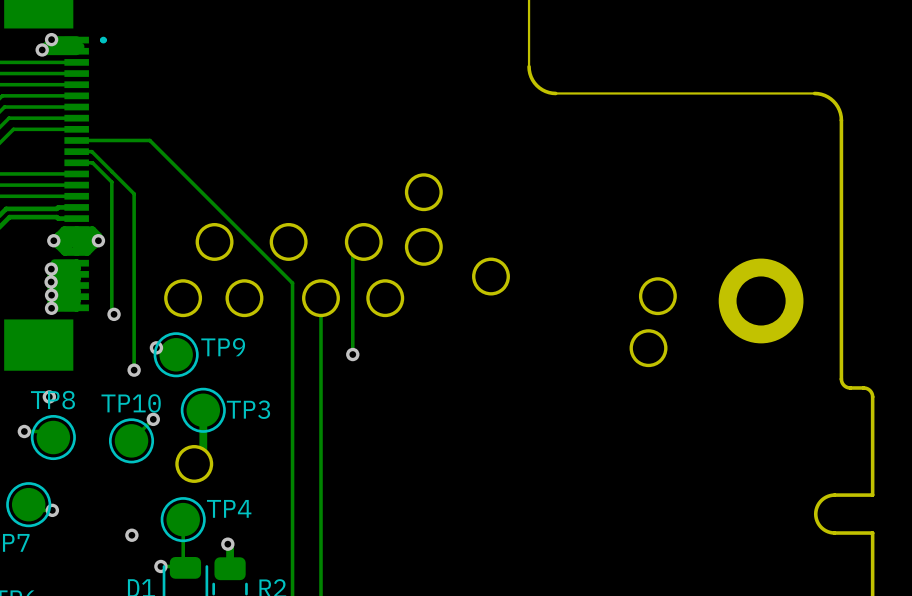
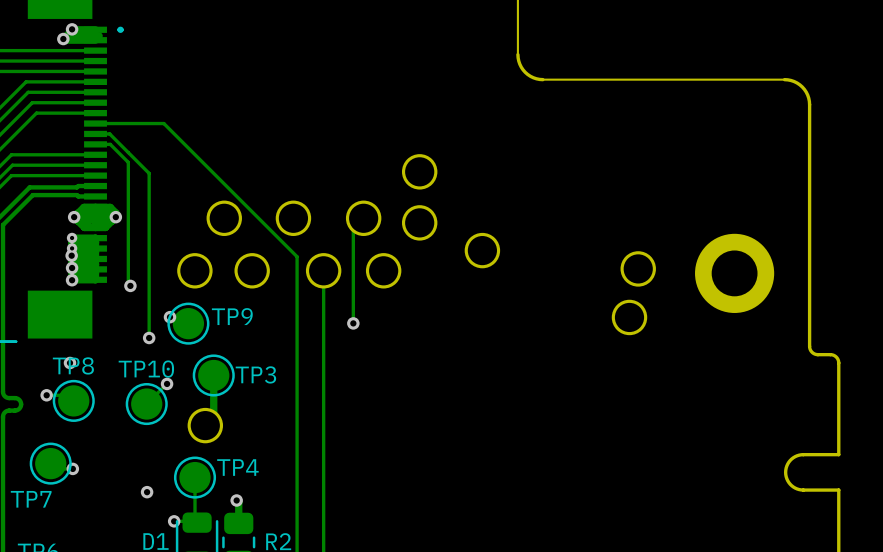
via: none -> (72, 237)
via: (51, 269) -> none
via: none -> (72, 248)

